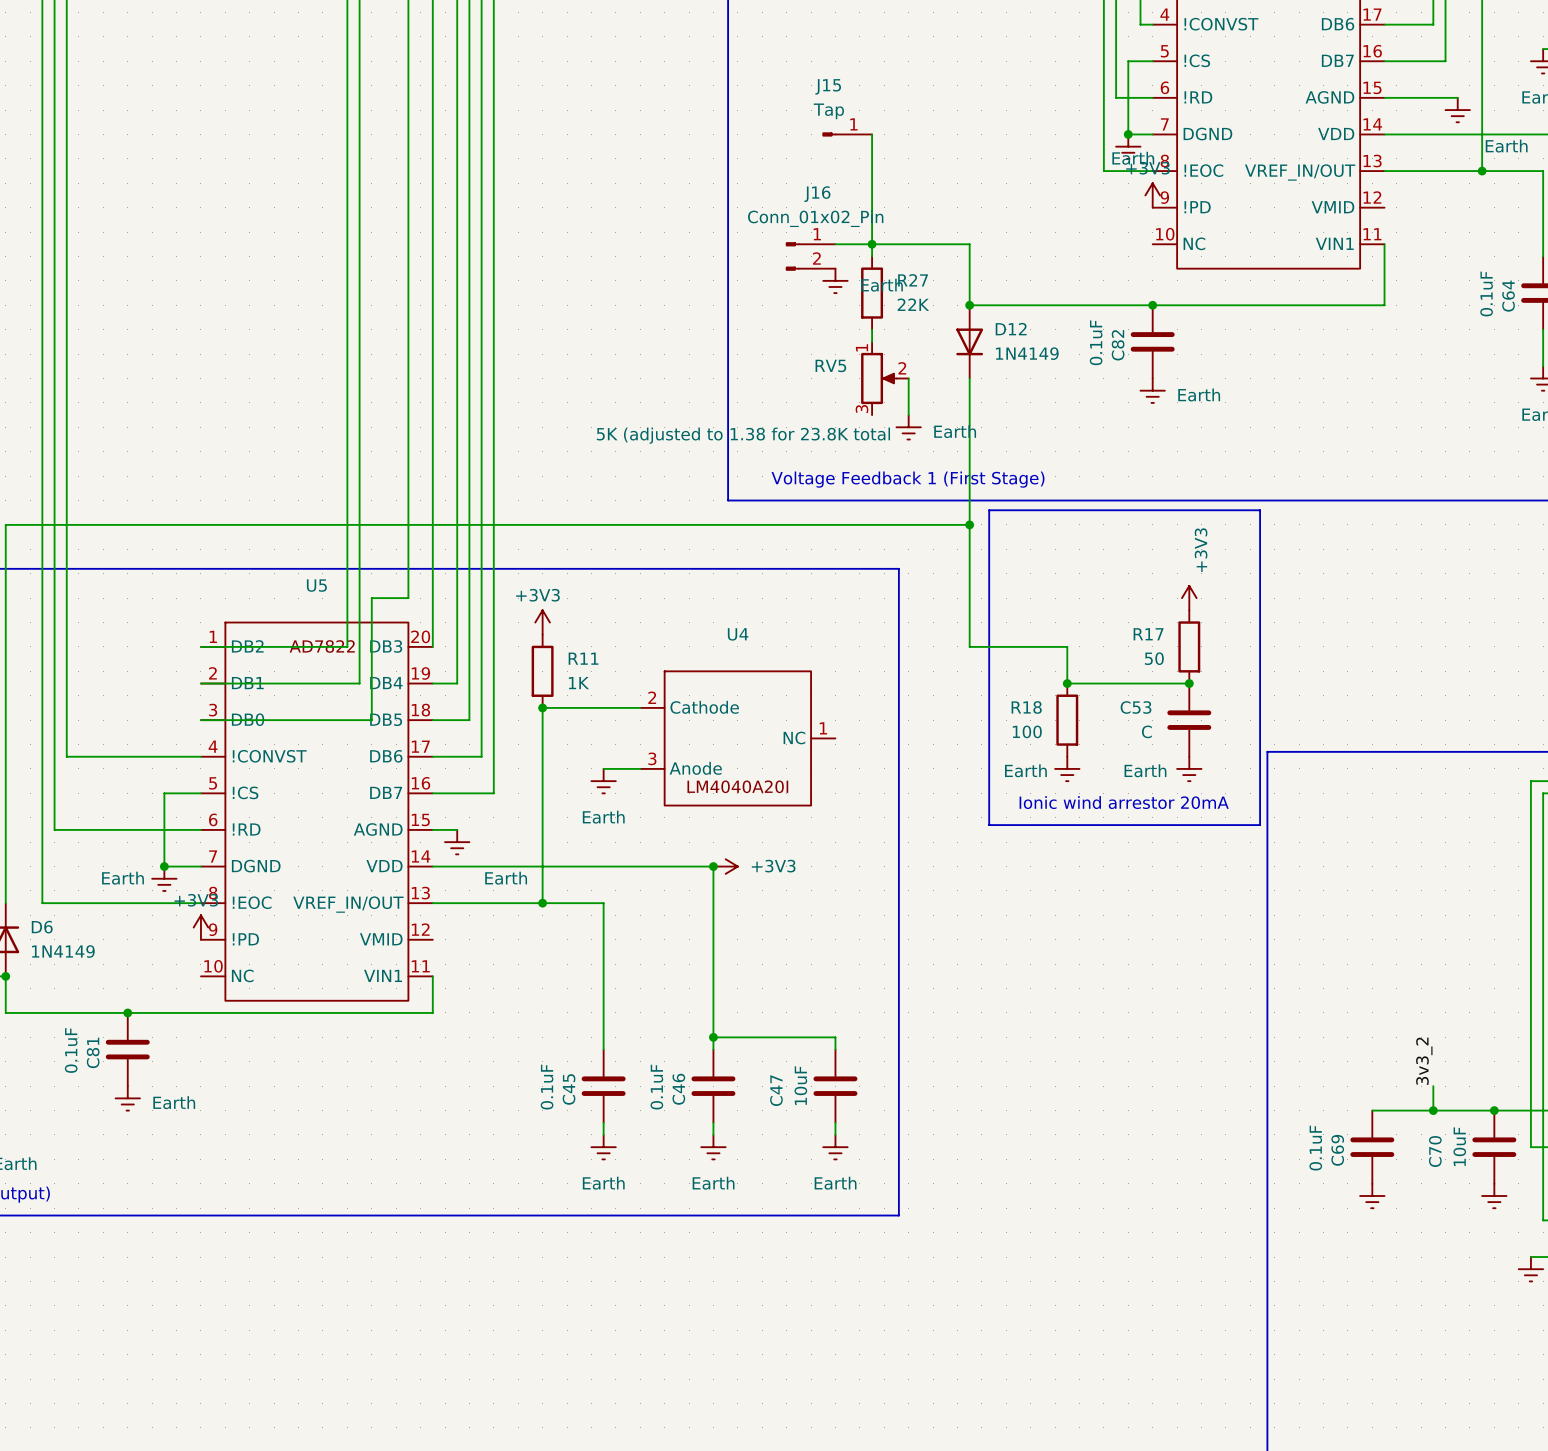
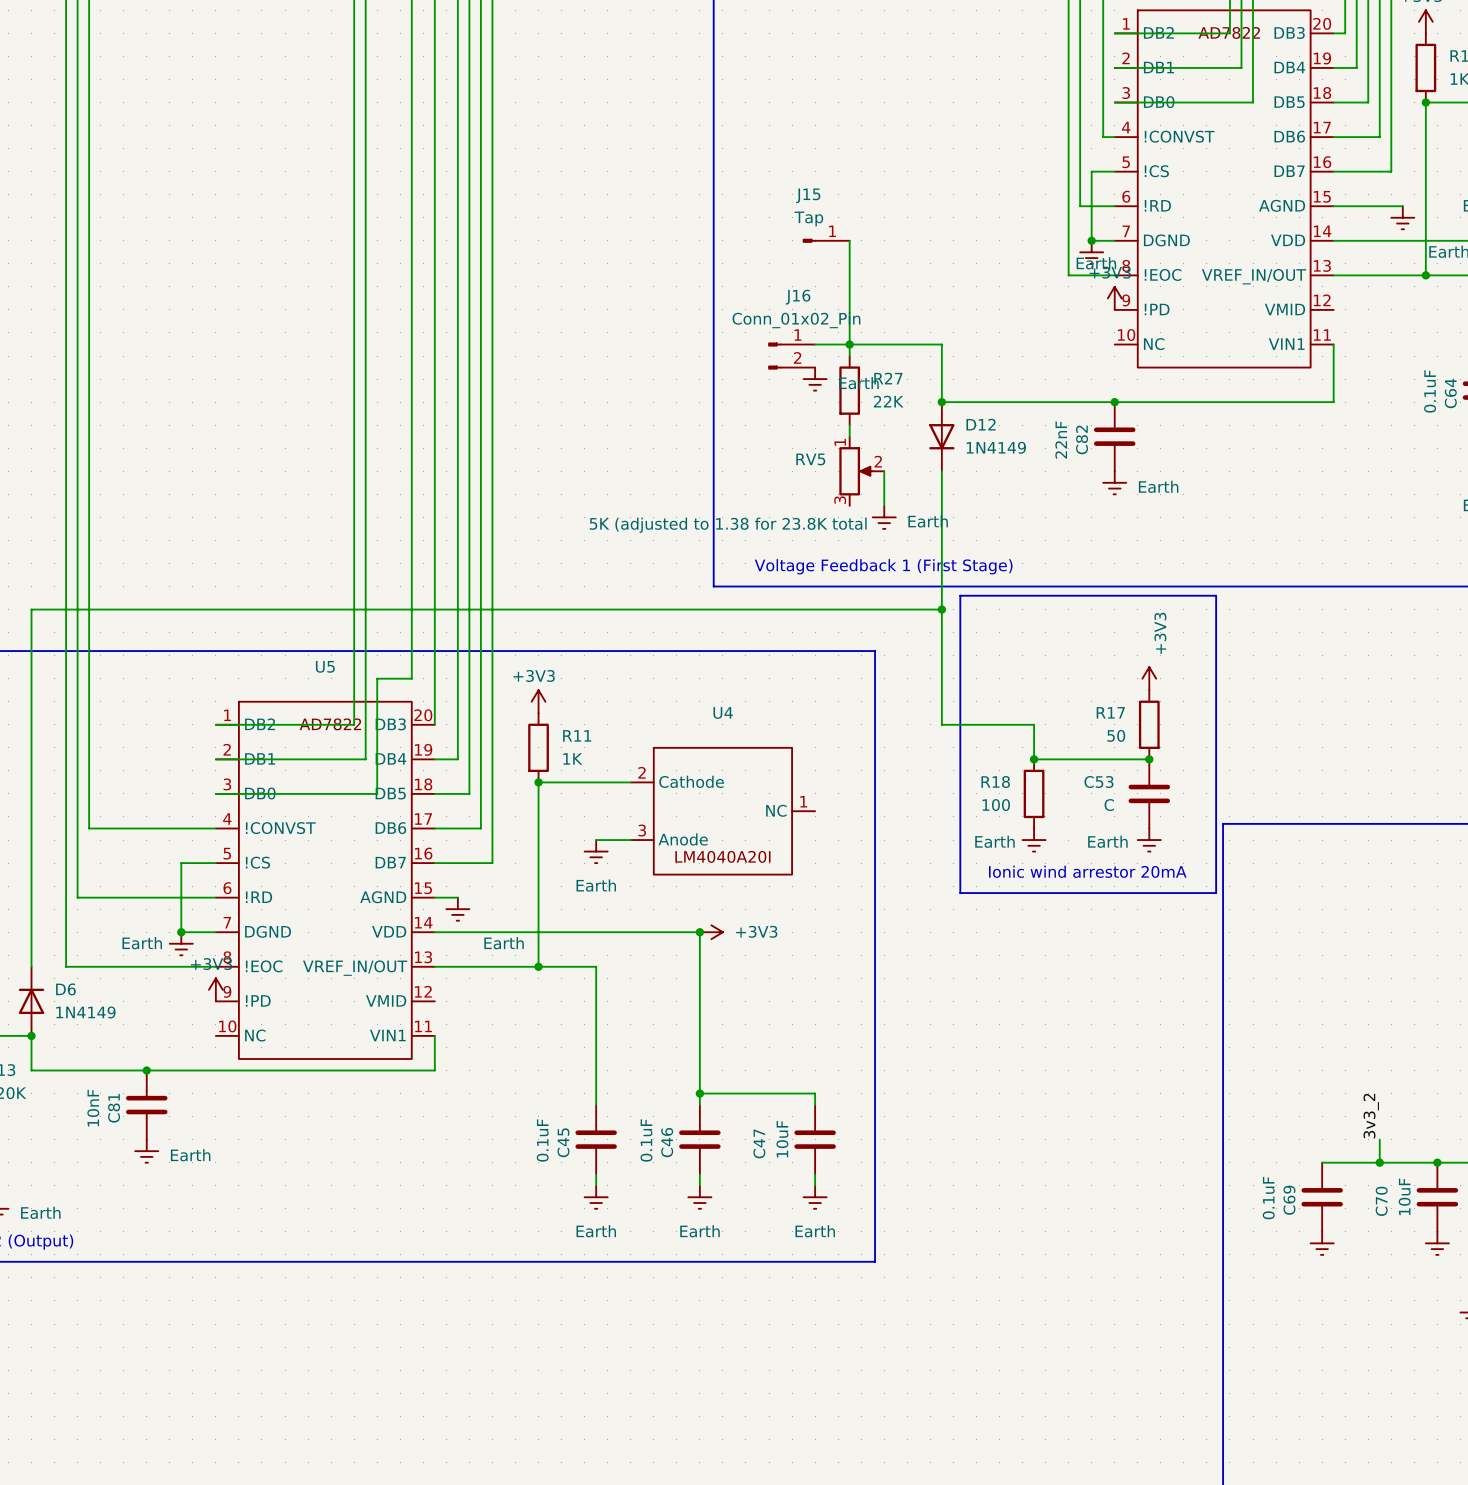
C82 value: 0.1uF (1096, 342) -> 22nF (1061, 440)
C81 value: 0.1uF (71, 1050) -> 10nF (93, 1108)

